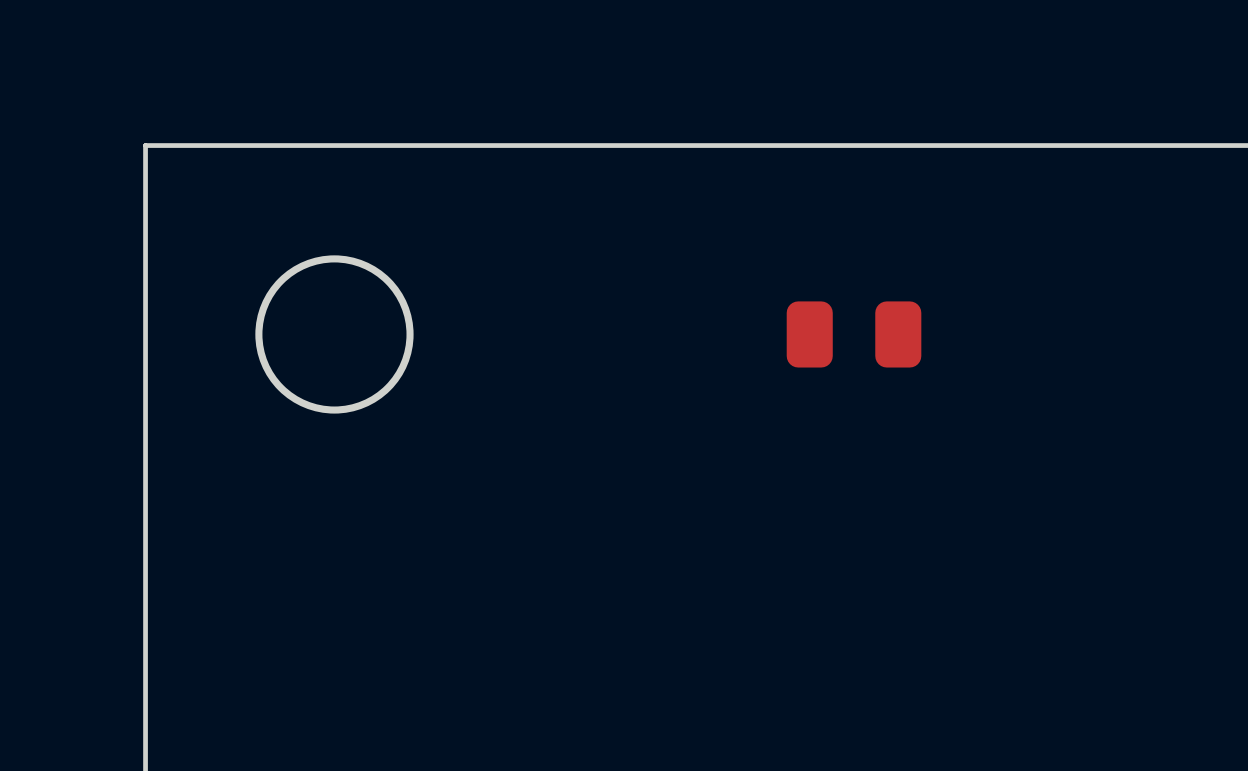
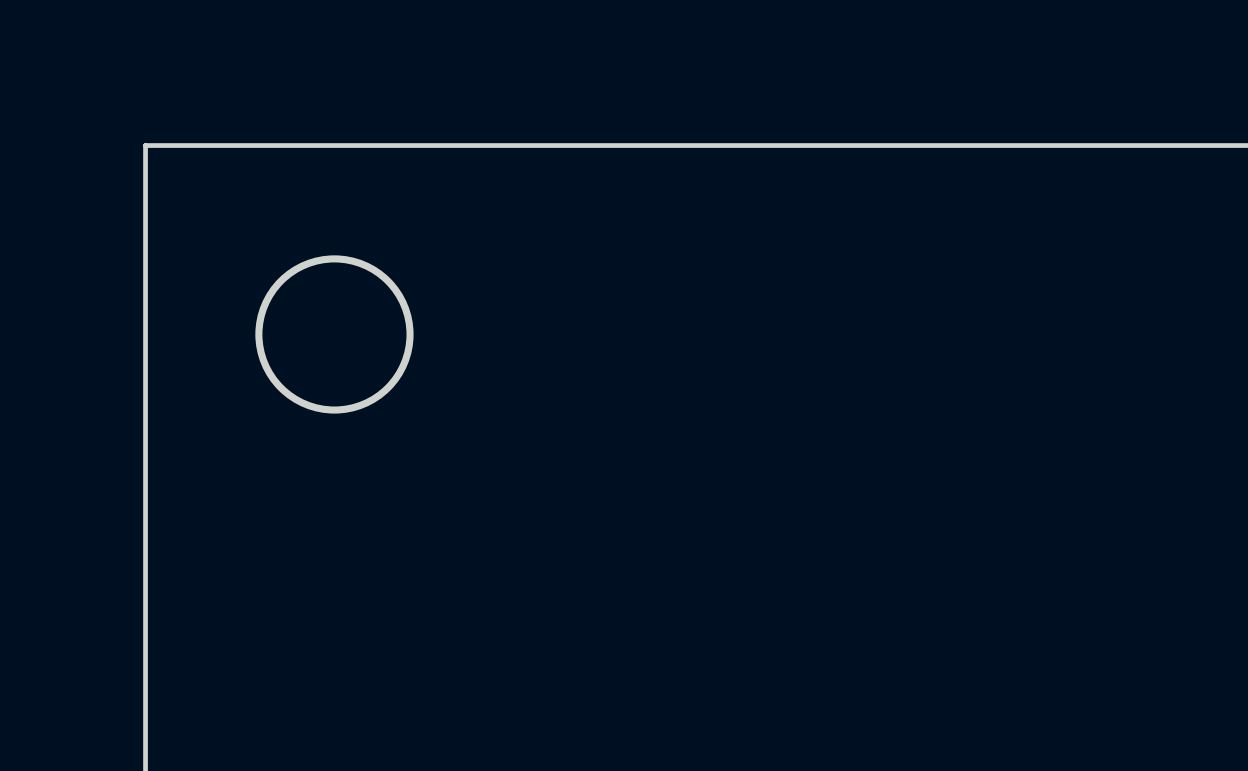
part: (854, 334) -> none

